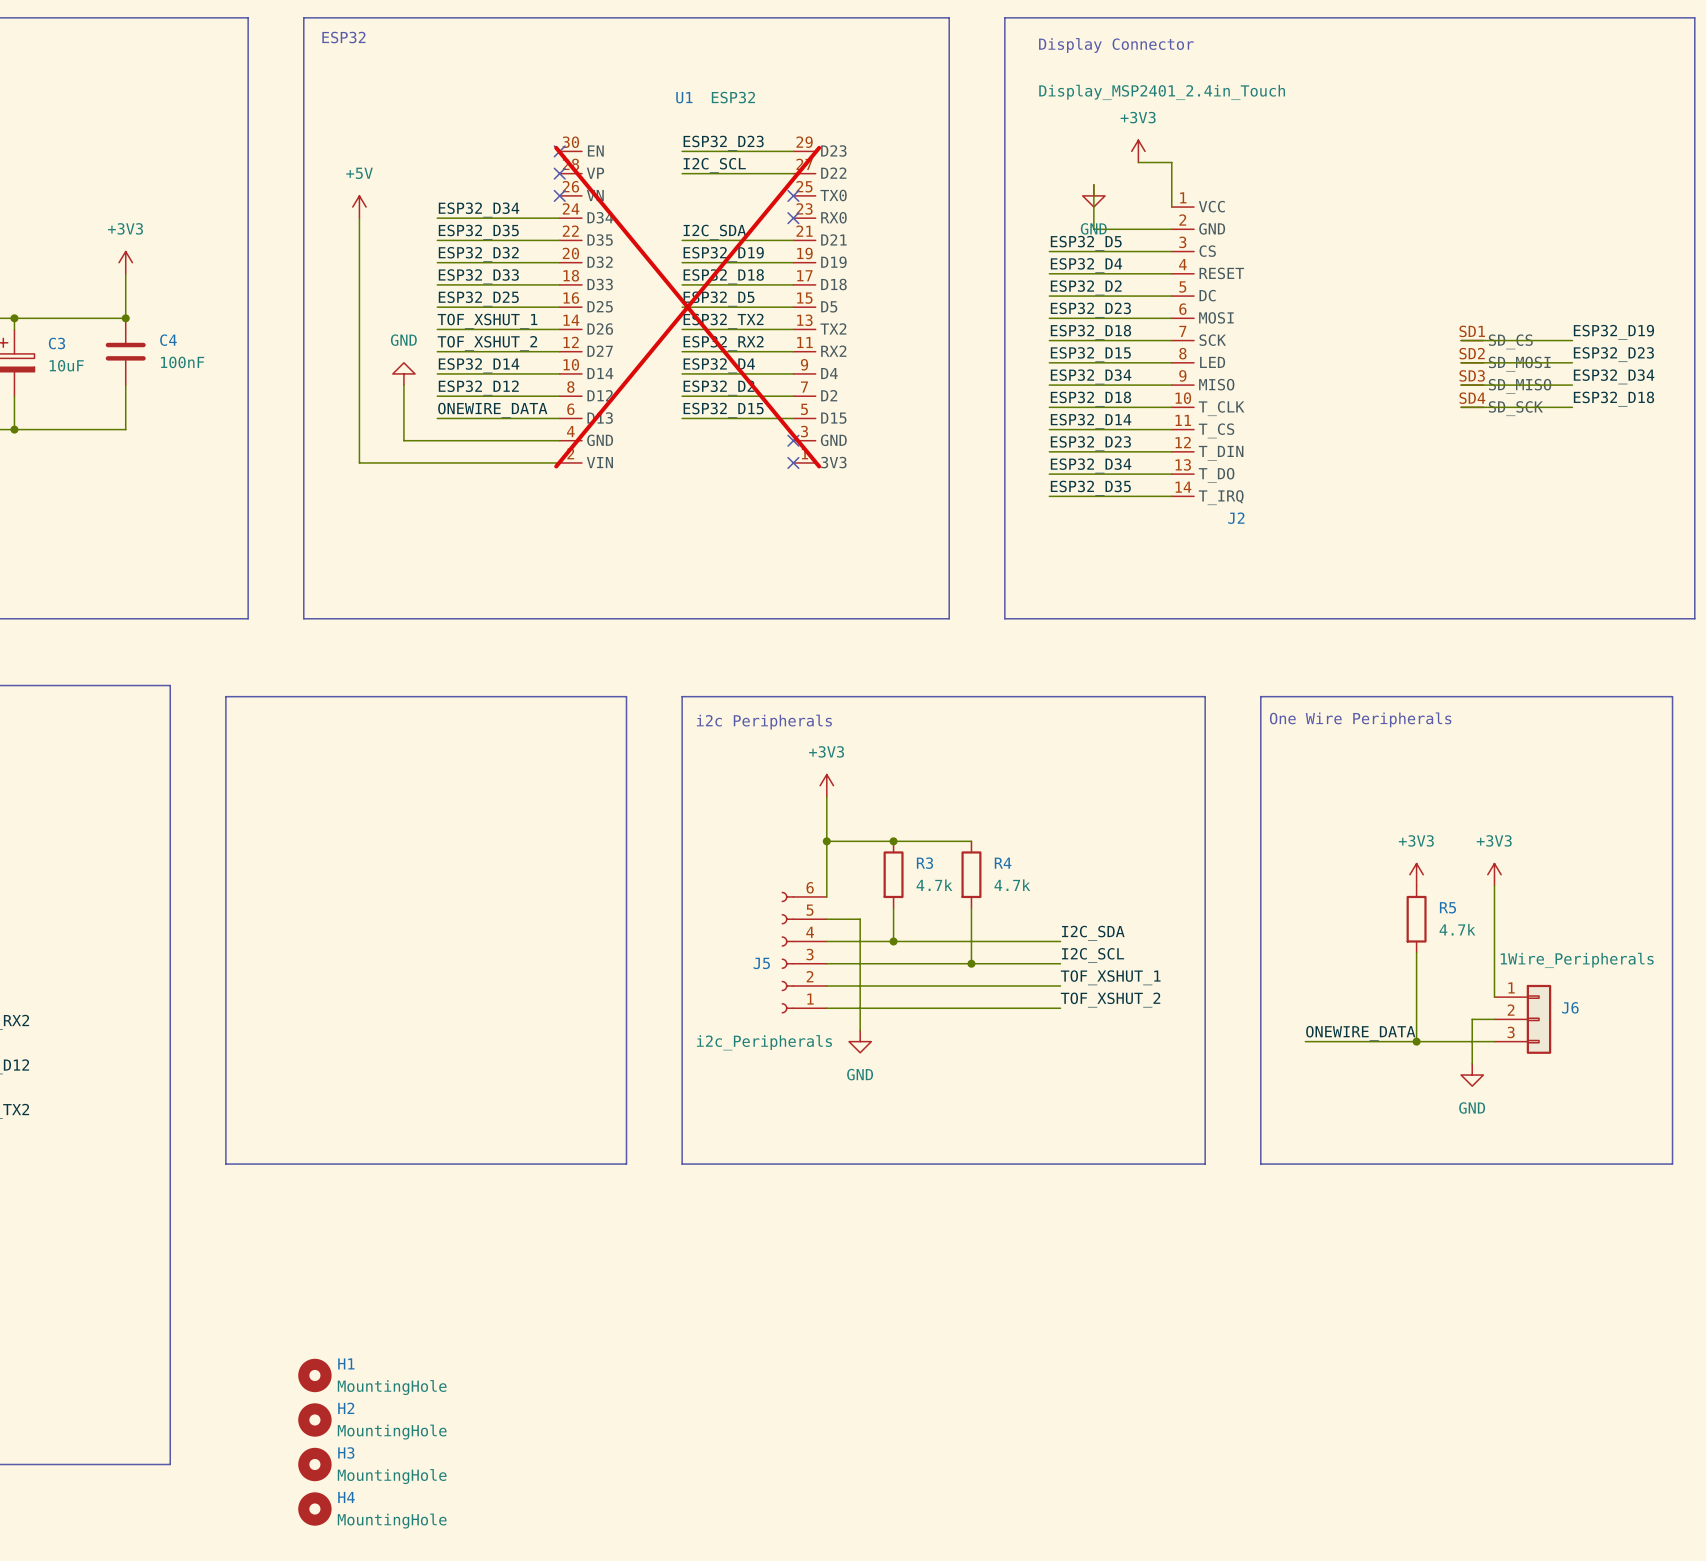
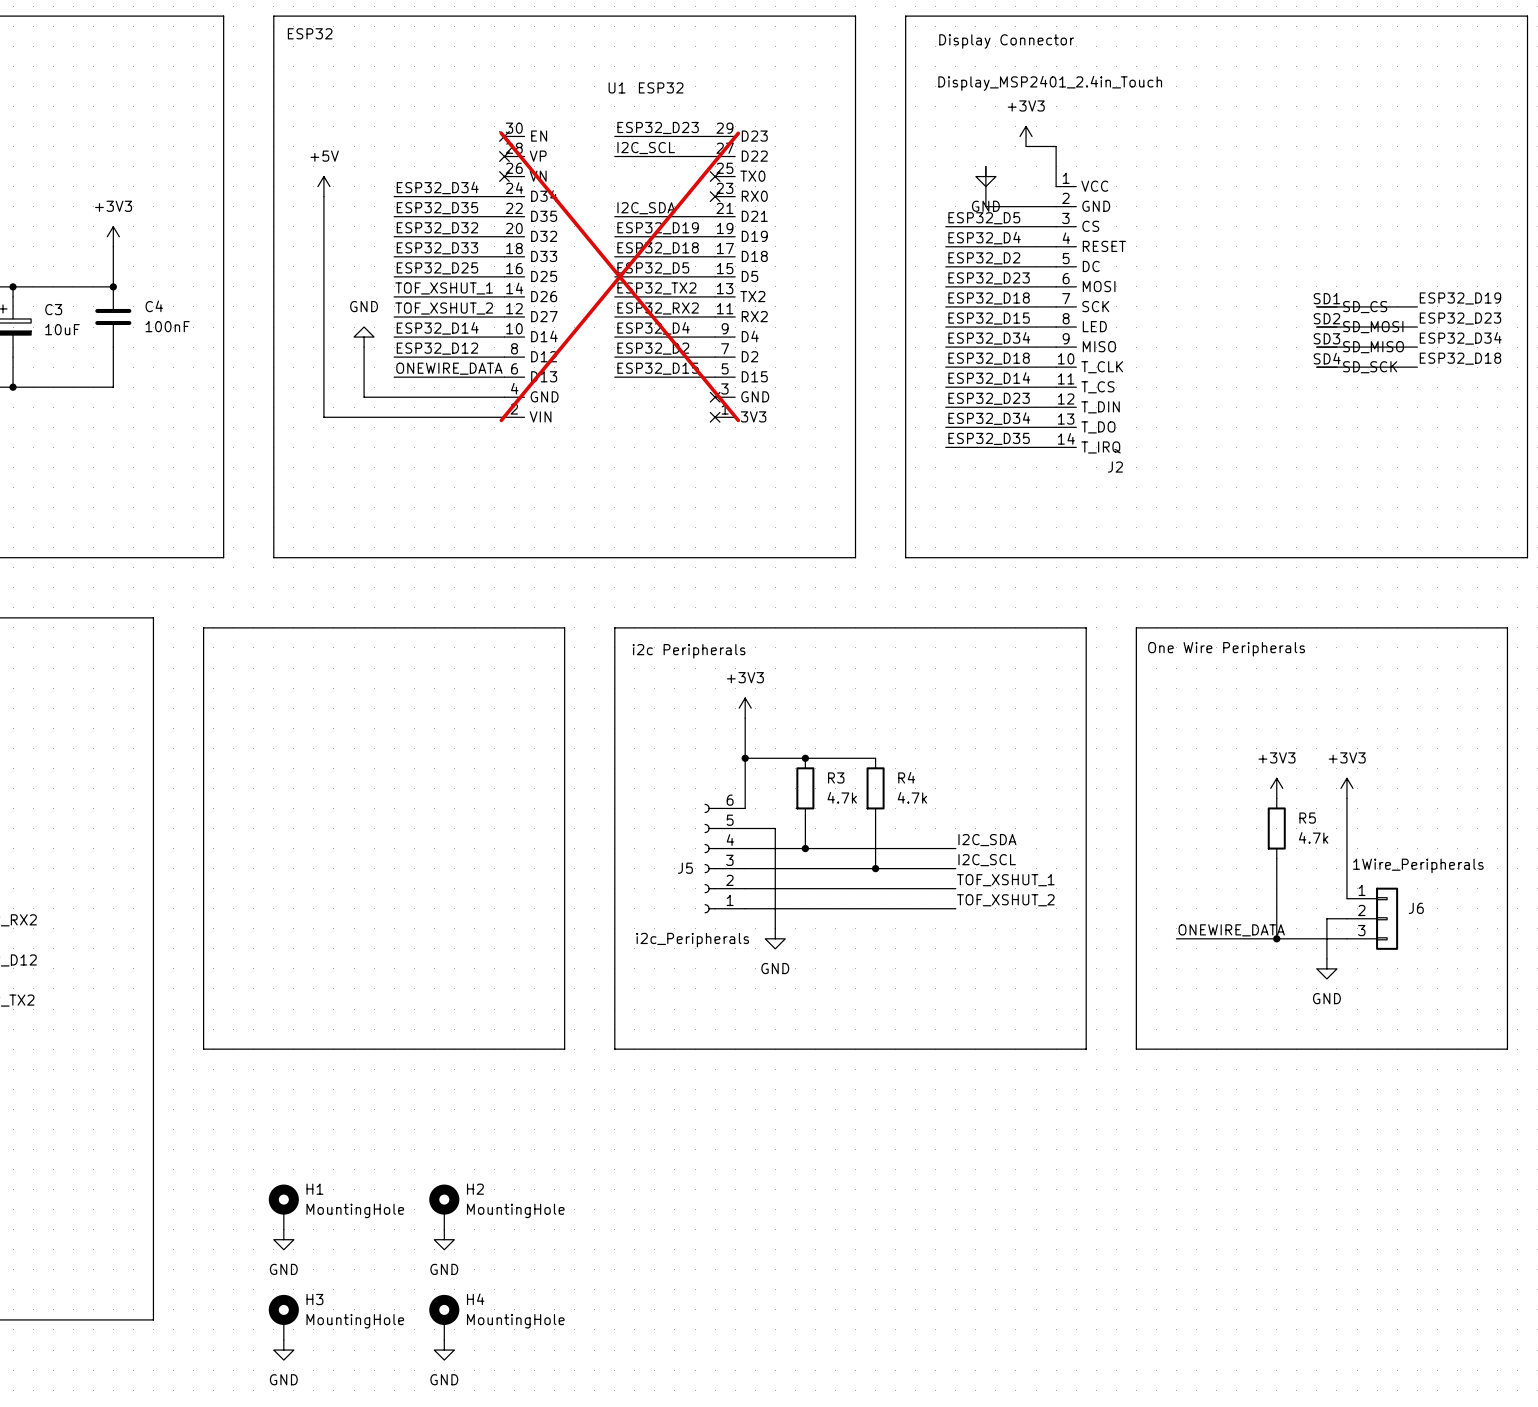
H1 symbol: [298, 1358, 332, 1393] -> [268, 1184, 299, 1230]
power symbol: none -> GND (283, 1239)
power symbol: none -> GND (444, 1239)
H2 symbol: [298, 1403, 332, 1437] -> [429, 1184, 460, 1230]
H3 symbol: [298, 1447, 332, 1482] -> [268, 1294, 299, 1341]
H4 symbol: [298, 1492, 332, 1526] -> [429, 1294, 460, 1341]
power symbol: none -> GND (283, 1350)
power symbol: none -> GND (444, 1350)

